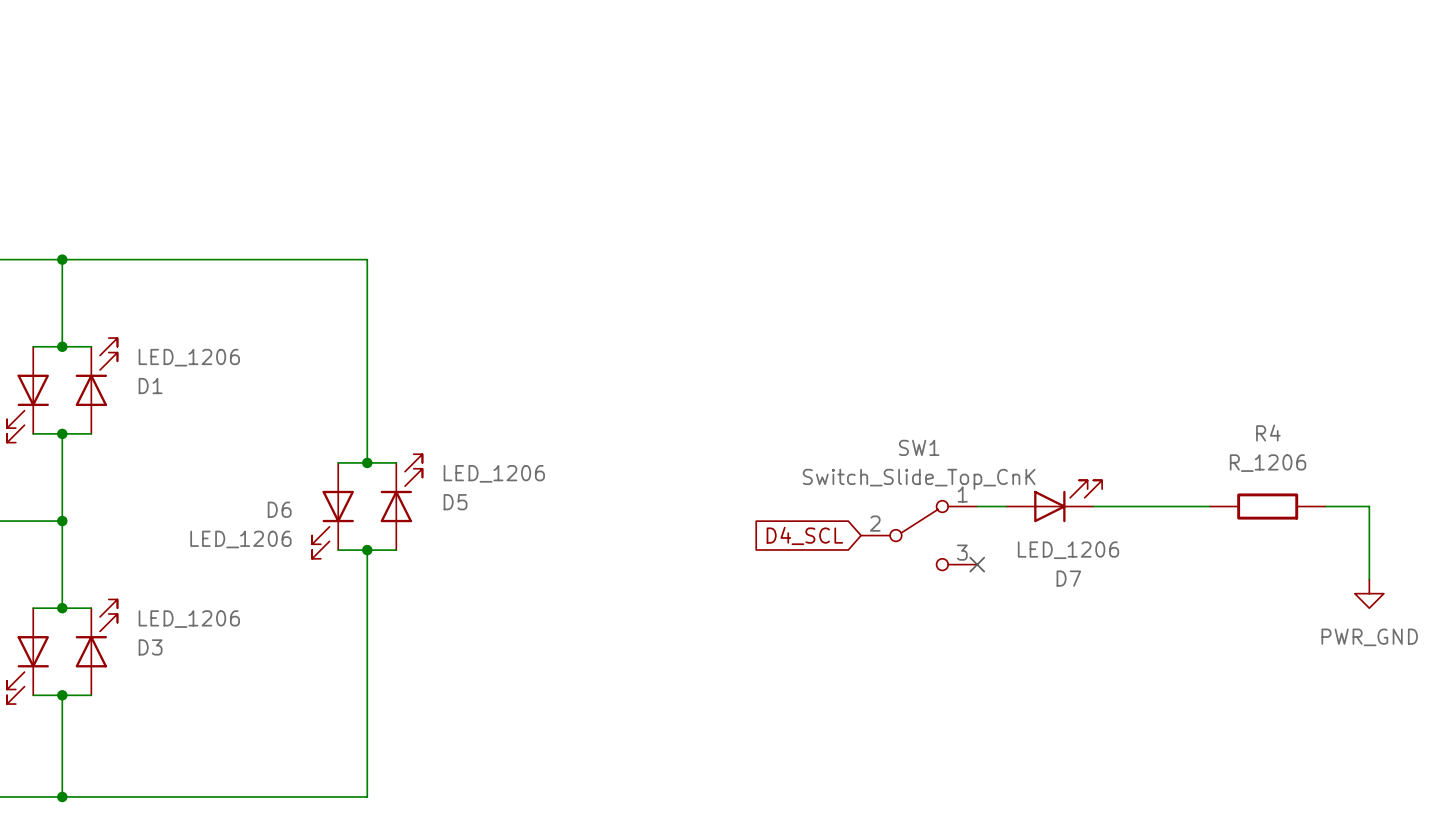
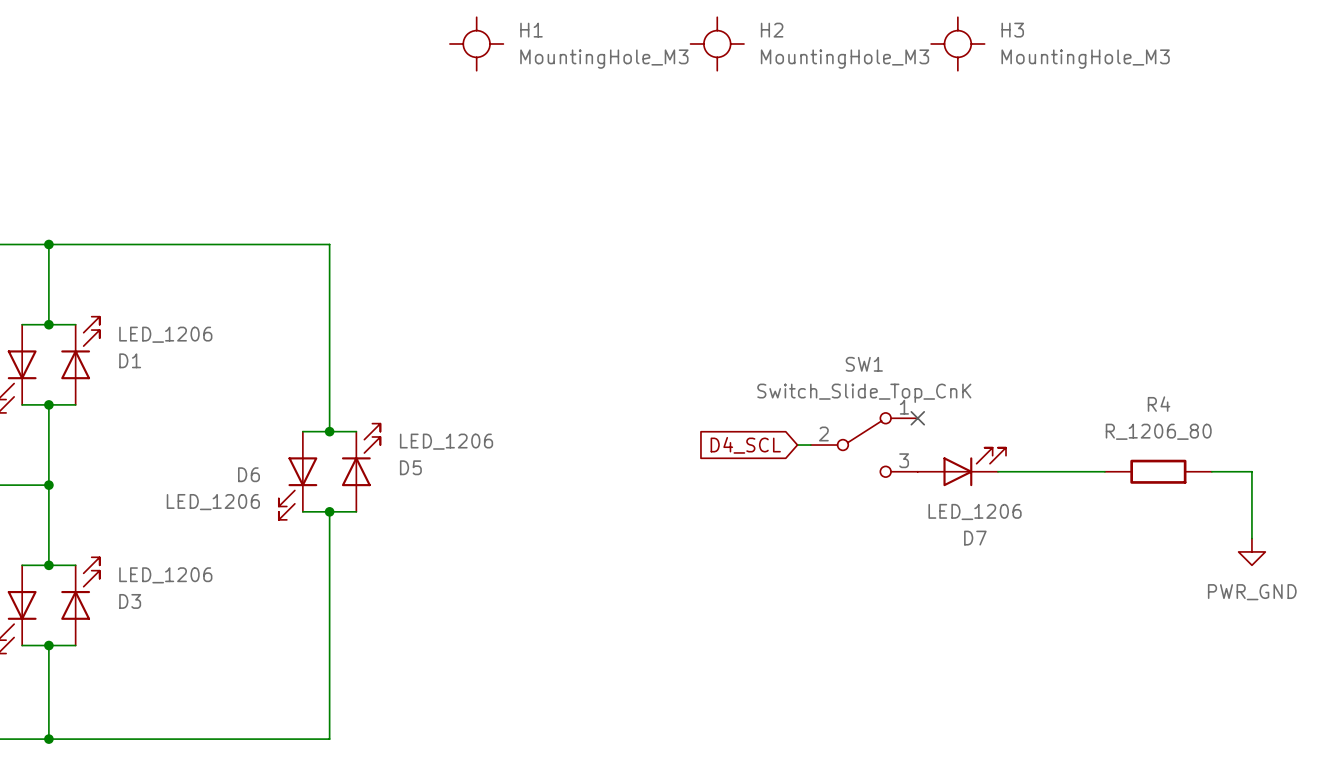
H1: none -> MountingHole_M3 (476, 43)
H2: none -> MountingHole_M3 (717, 43)
H3: none -> MountingHole_M3 (957, 43)
no-connect mark: none -> (917, 418)
R4 value: R_1206 (1268, 463) -> R_1206_80 (1158, 431)
wire: none -> (797, 445) (810, 445)
global label position: D4_SCL (804, 535) -> D4_SCL (745, 445)
SW1 position: (919, 535) -> (864, 445)
no-connect mark: (977, 564) -> none

